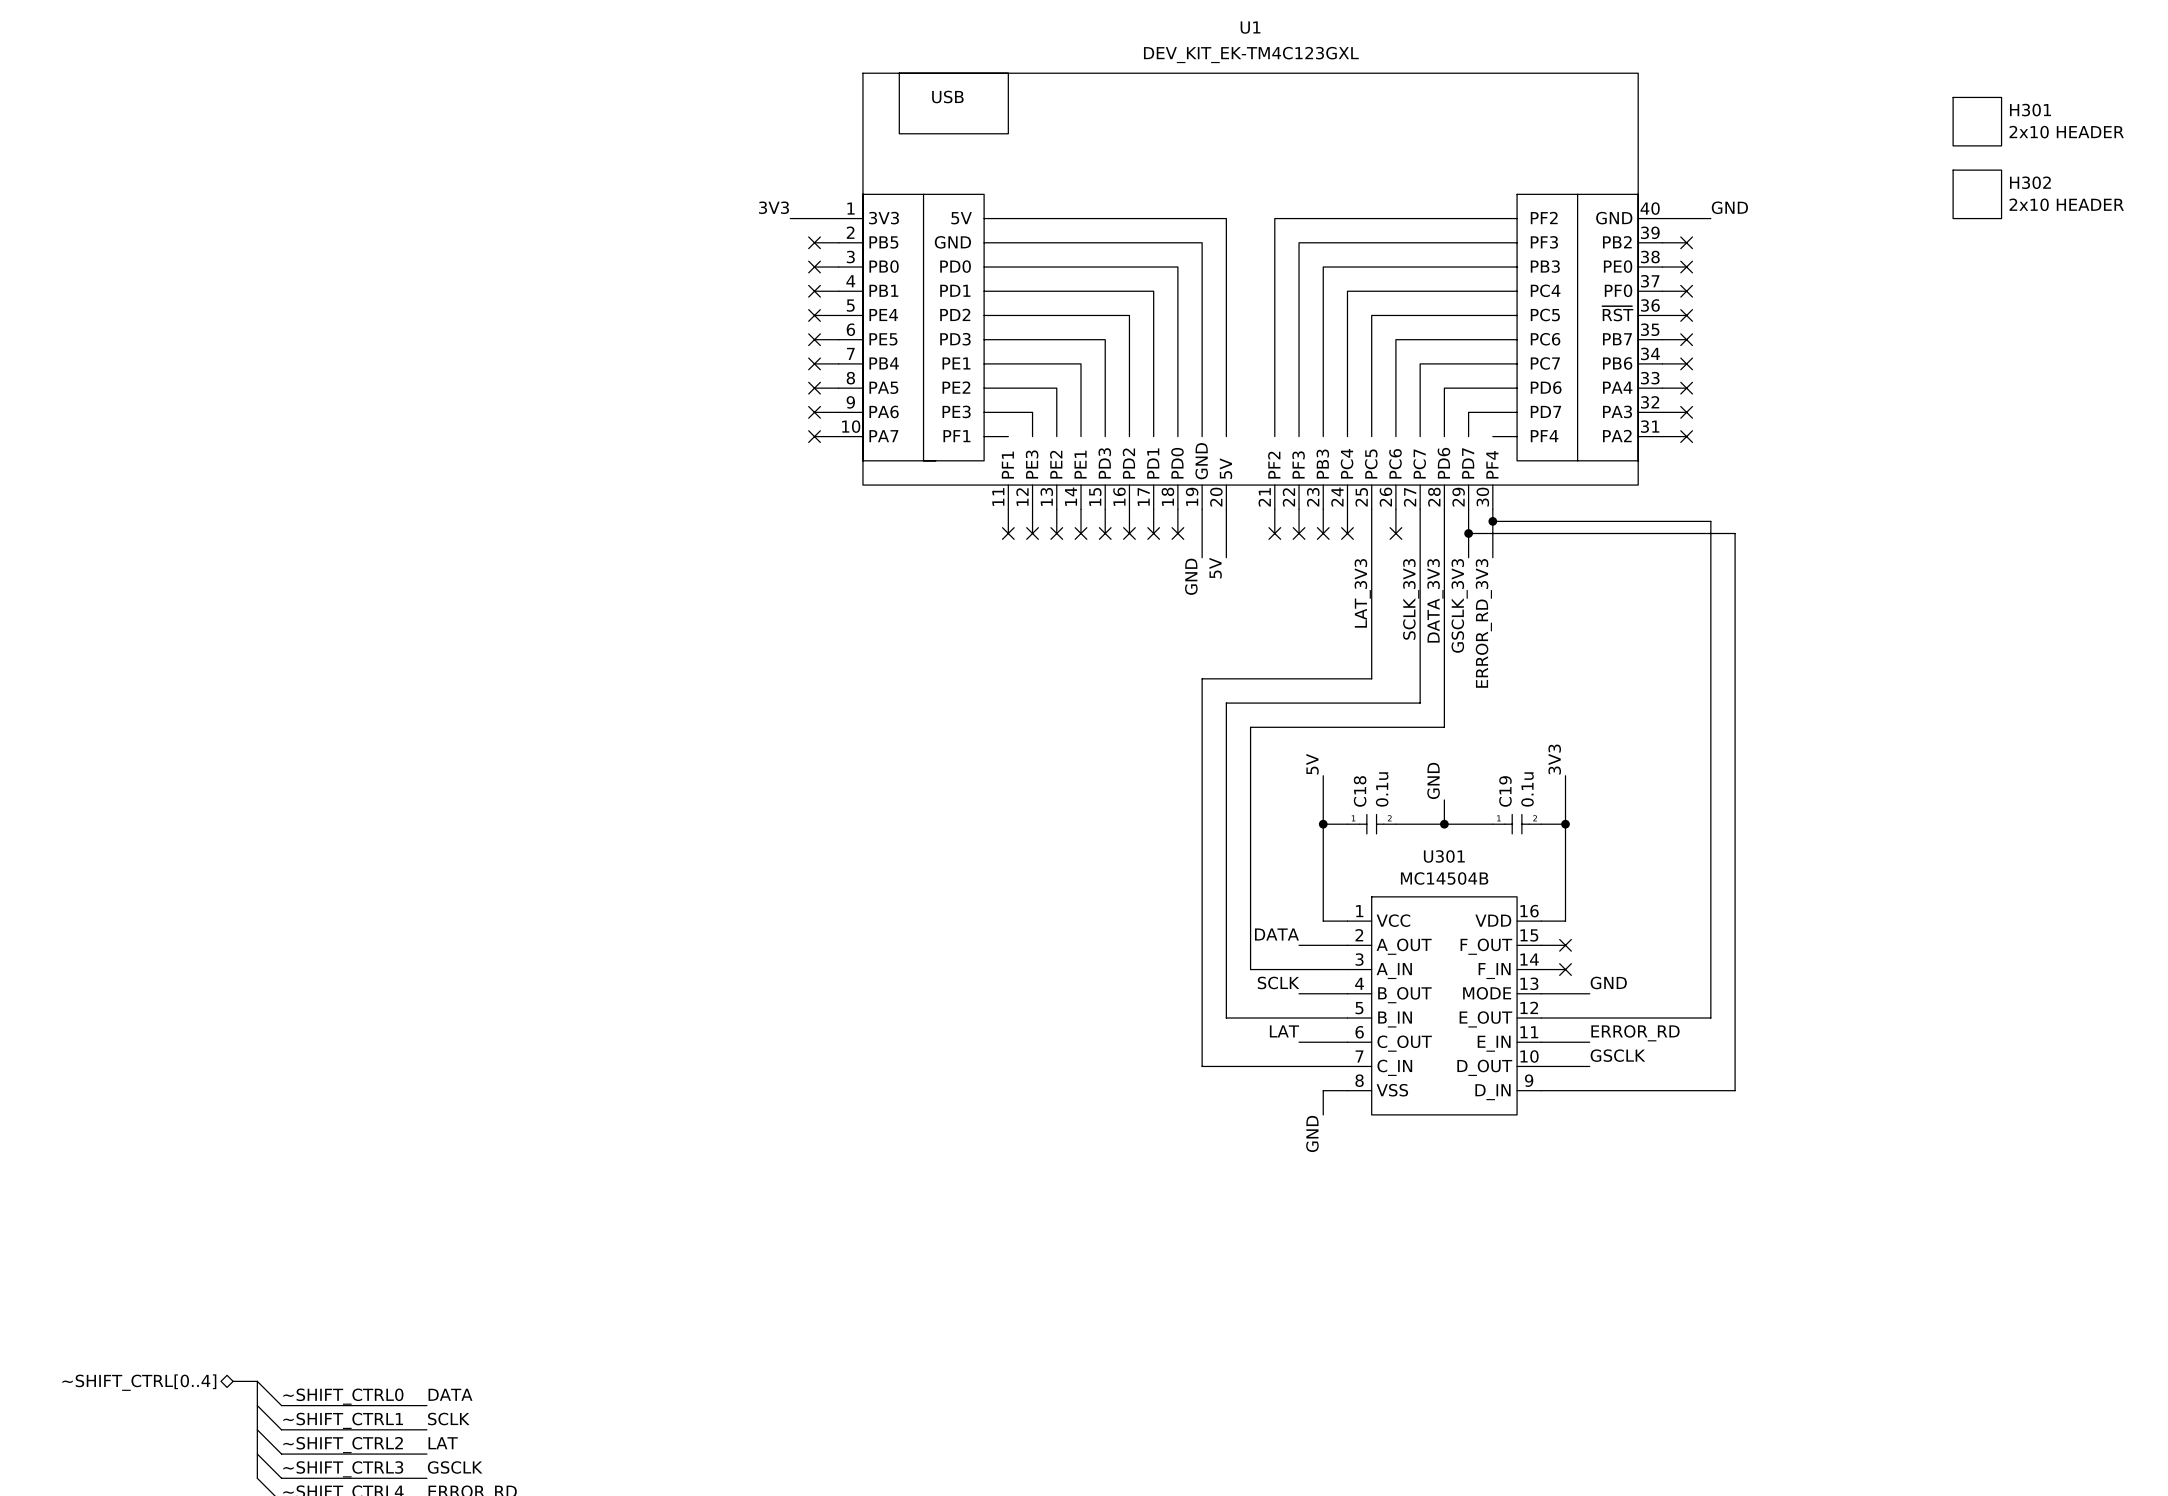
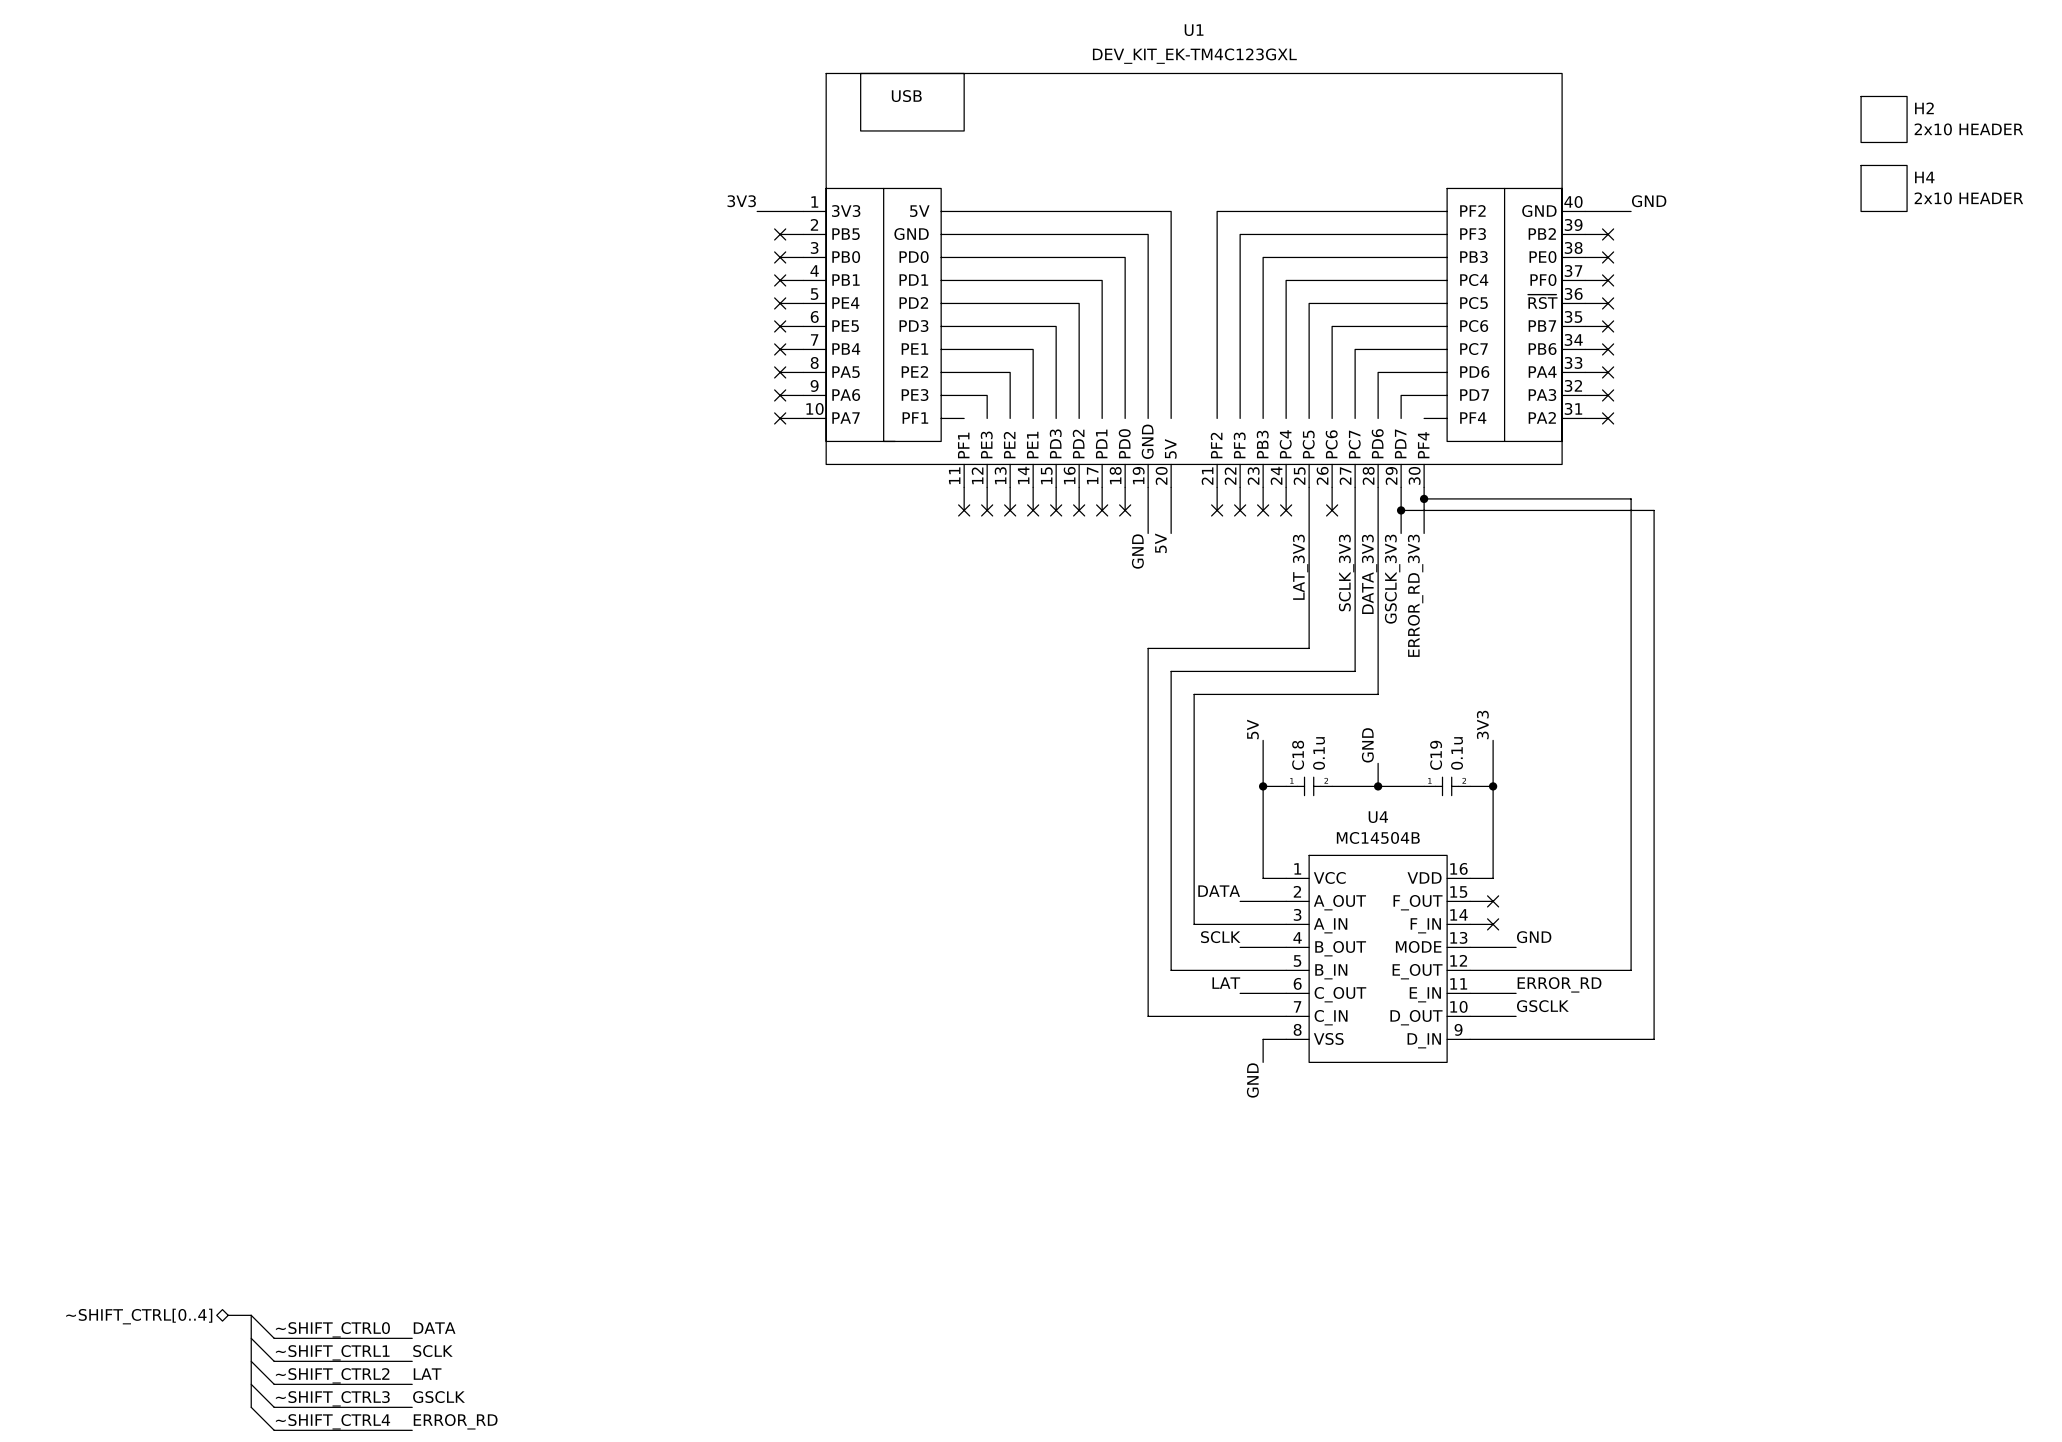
H301 name: H301 (2030, 110) -> H2 (1924, 108)
H302 name: H302 (2030, 182) -> H4 (1924, 177)
U301 name: U301 (1444, 856) -> U4 (1378, 817)

